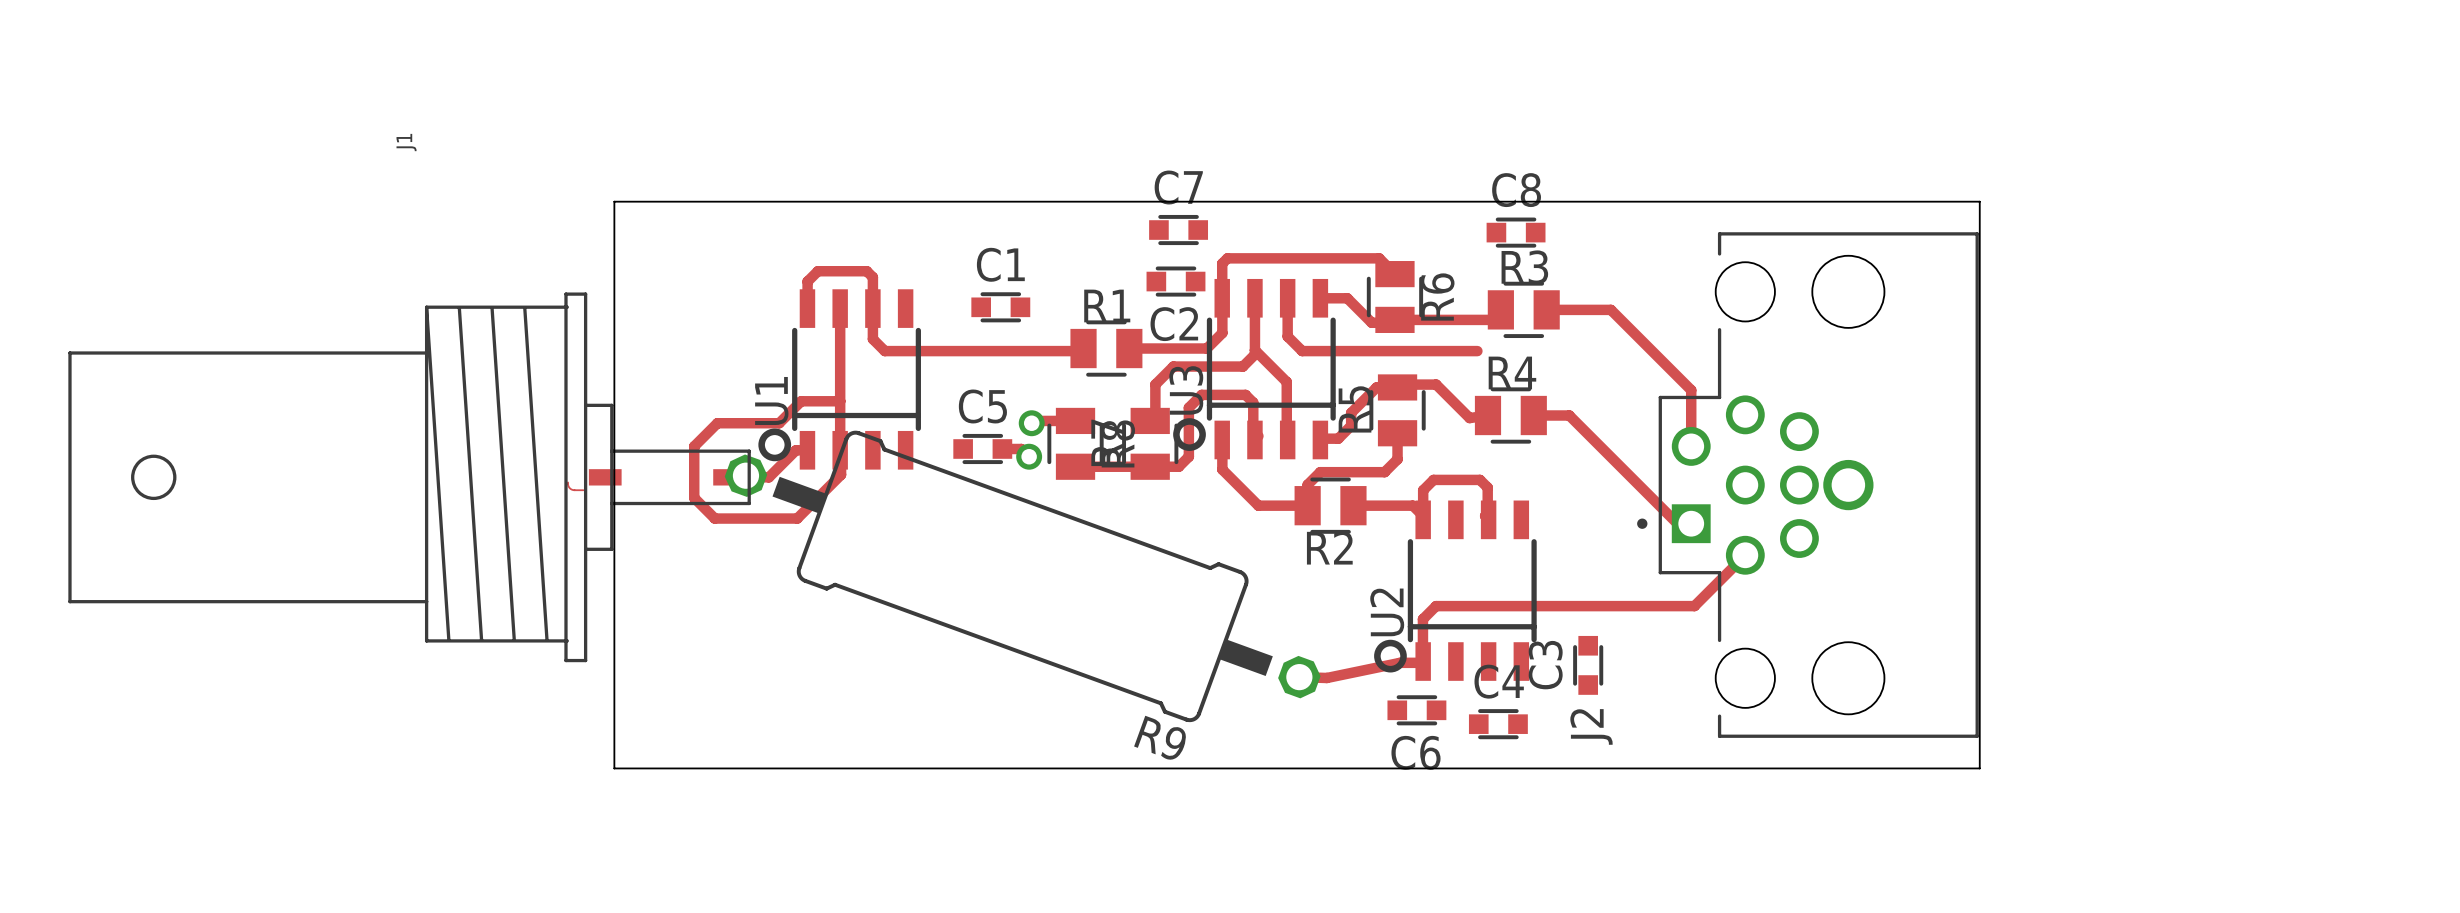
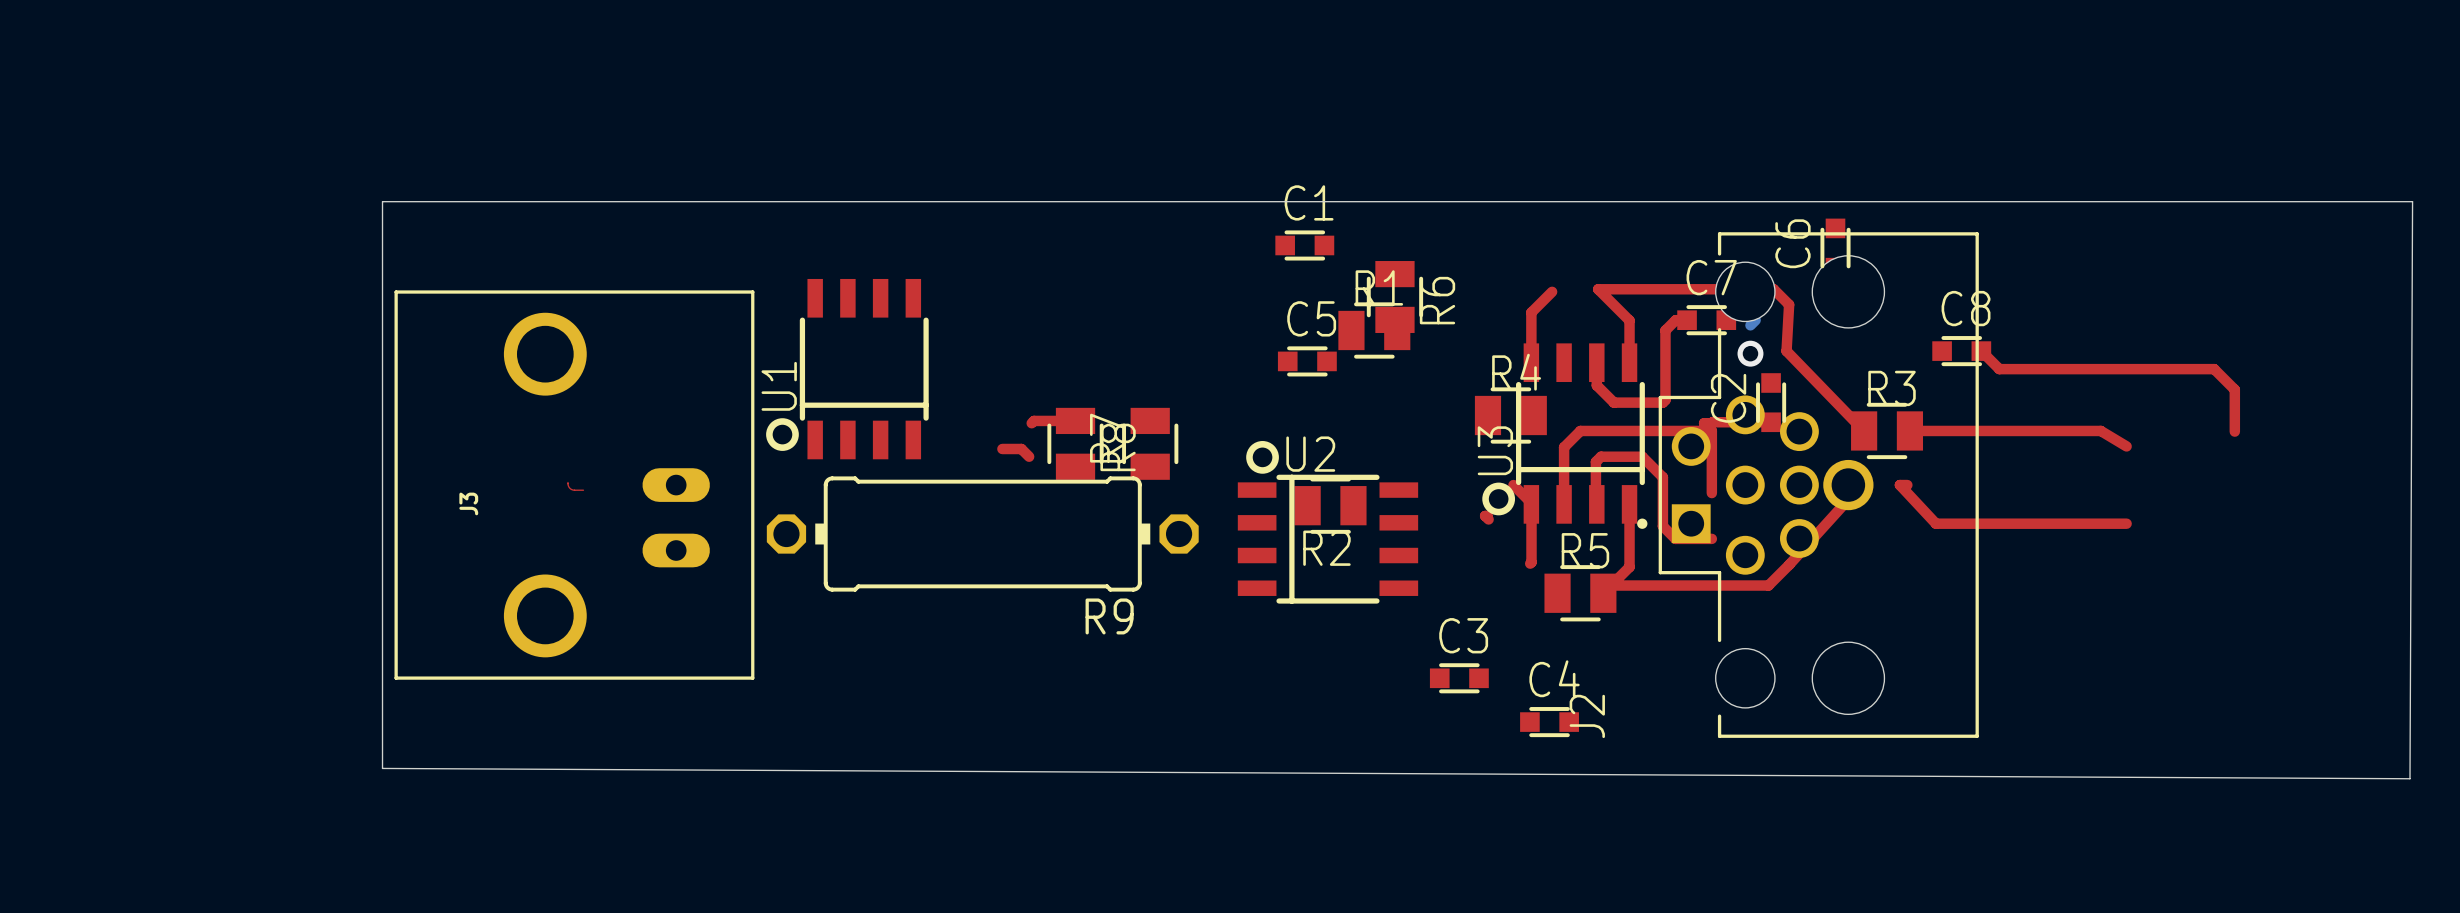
board edge: (614, 201) (614, 768) (1979, 768) (1979, 201) -> (614, 201) (382, 201) (382, 768) (2409, 778) (2412, 201) (1979, 201)
C7 position: (1178, 230) -> (1706, 320)
C8 position: (1516, 232) -> (1961, 351)
top track: (1394, 274) (1379, 258) (1227, 258) (1222, 263) (1222, 298) -> none
C2 rotation: 0° (1175, 281) -> 90° clockwise (1771, 402)
C2 position: (1175, 281) -> (1771, 402)
top track: none -> (1552, 291) (1531, 312) (1531, 362)
top track: (1222, 298) (1222, 333) (1206, 348) (1129, 348) -> none
top track: (1254, 298) (1254, 354) (1242, 366) (1173, 366) (1155, 384) (1155, 412) (1147, 420) -> none
top track: (1287, 298) (1287, 336) (1302, 351) (1477, 351) -> none
top track: (1320, 298) (1347, 298) (1371, 322) (1400, 322) (1400, 325) -> none
C1 position: (1000, 307) -> (1304, 245)
top track: (807, 308) (807, 281) (817, 271) (866, 271) (872, 277) (872, 339) (884, 351) (1080, 351) -> none
top track: (840, 308) (840, 450) -> none
top track: (1500, 309) (1498, 319) (1394, 319) -> none
R3 position: (1523, 309) -> (1887, 430)
top track: (1546, 309) (1610, 309) (1691, 390) (1691, 446) -> none
top track: none -> (1687, 320) (1675, 320) (1665, 330) (1665, 400) (1662, 402) (1613, 402) (1596, 385) (1596, 362)
bottom track: none -> (1755, 320) (1750, 325)
R1 position: (1106, 348) -> (1374, 330)
top track: (1254, 350) (1286, 382) (1286, 441) (1289, 443) -> none
top track: none -> (1981, 351) (1999, 369) (2214, 369) (2234, 389) (2234, 431)
via: none -> (1750, 353)
top track: none -> (1629, 362) (1629, 320) (1598, 289) (1773, 289) (1789, 304) (1786, 351) (1866, 433)
U3 position: (1254, 369) -> (1563, 433)
U1 position: (839, 379) -> (847, 369)
top track: (840, 401) (801, 401) (779, 423) (717, 423) (694, 446) (694, 497) (714, 518) (797, 518) (841, 474) (841, 451) (838, 448) (838, 443) -> none
R5 rotation: 0° (1397, 410) -> 90° clockwise (1580, 593)
R5 position: (1397, 410) -> (1580, 593)
top track: (1487, 415) (1469, 418) (1436, 384) (1400, 384) (1397, 387) (1376, 387) (1351, 412) (1351, 425) (1338, 438) (1320, 439) -> none
top track: (1533, 415) (1569, 415) (1681, 527) (1687, 527) (1691, 523) -> none
top track: none -> (1771, 422) (1712, 422) (1703, 430) (1580, 430) (1564, 447) (1564, 504)
via: (1031, 423) -> none
top track: none -> (1709, 425) (1704, 423) (1711, 430) (1711, 493)
R9 footprint: [724, 430, 1321, 723] -> [766, 476, 1199, 592]
top track: none -> (1909, 430) (2100, 430) (2126, 446)
top track: (1397, 433) (1394, 430) (1394, 428) (1397, 430) (1397, 459) (1384, 472) (1320, 472) (1307, 484) (1307, 505) (1258, 505) (1222, 469) (1222, 440) -> none
top track: (1258, 436) (1253, 430) (1253, 402) (1245, 394) (1201, 394) (1188, 407) (1188, 456) (1178, 466) (1075, 466) -> none
C5 position: (982, 448) -> (1307, 361)
top track: (807, 450) (795, 450) (768, 477) (729, 477) -> none
via: (1029, 456) -> none
J1: (409, 477) -> none
J3: none -> (574, 485)
top track: none -> (1513, 485) (1528, 500) (1531, 500) (1530, 563)
top track: none -> (1861, 485) (1768, 585) (1611, 585)
top track: none -> (1907, 485) (1899, 485) (1935, 523) (2126, 523)
top track: none -> (1596, 504) (1595, 461) (1601, 456) (1642, 456) (1662, 477) (1662, 526) (1675, 538) (1711, 538)
top track: none -> (1629, 504) (1629, 567) (1603, 593)
top track: (1353, 505) (1412, 505) (1423, 515) -> none
top track: (1423, 519) (1423, 490) (1433, 479) (1479, 479) (1487, 487) (1488, 519) -> none
top track: (1745, 555) (1694, 606) (1436, 606) (1422, 619) (1422, 661) -> none
U2 rotation: 0° (1455, 590) -> 90° clockwise (1327, 522)
U2 position: (1455, 590) -> (1327, 522)
top track: (1423, 661) (1400, 662) (1326, 677) (1299, 677) -> none
C3 rotation: 0° (1588, 665) -> 90° clockwise (1459, 678)
C3 position: (1588, 665) -> (1459, 678)
C6 rotation: 0° (1416, 710) -> 90° clockwise (1835, 248)
C6 position: (1416, 710) -> (1835, 248)
C4 position: (1498, 724) -> (1549, 722)
R9 name position: R9 (1160, 738) -> R9 (1109, 616)

